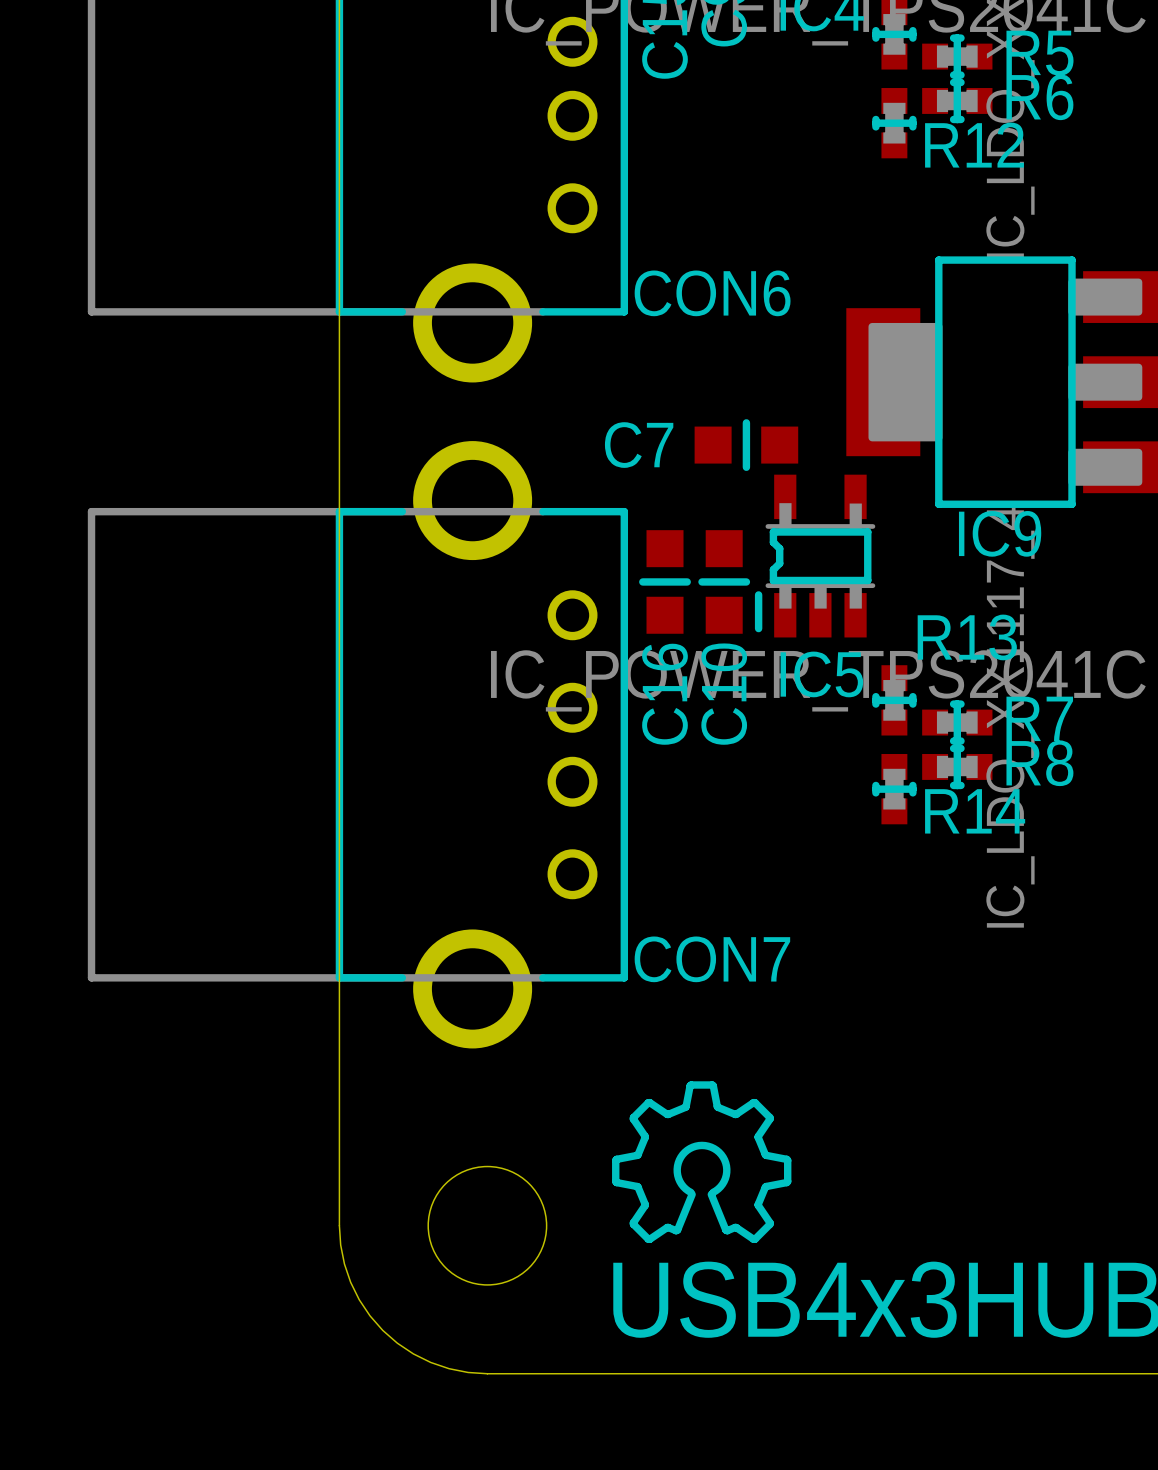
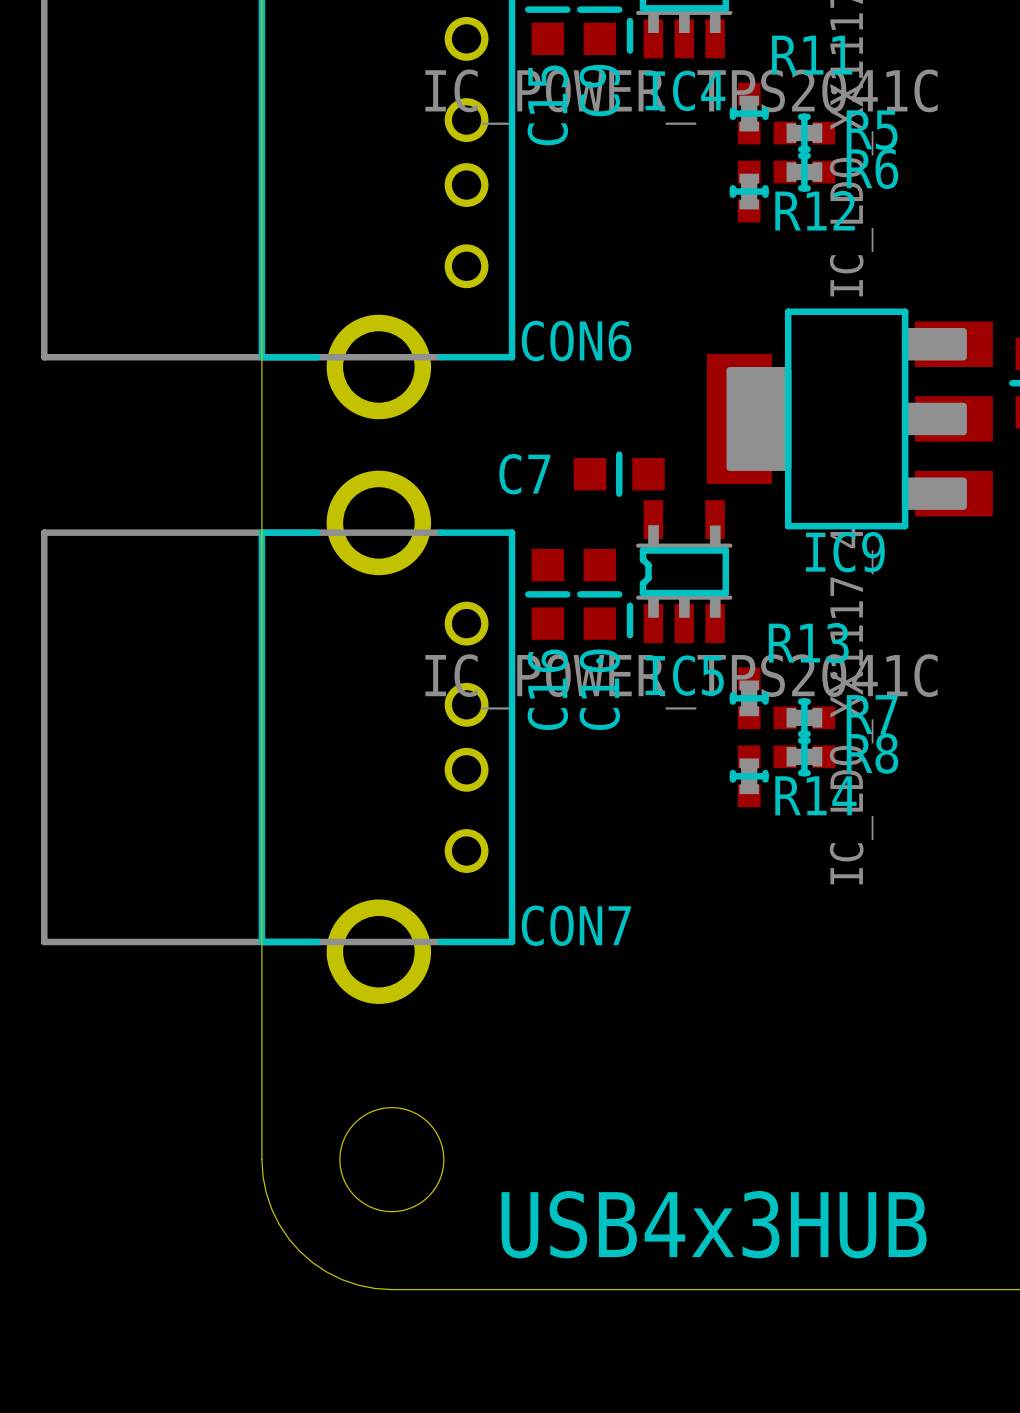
drawing: [612, 1081, 792, 1244] -> none

